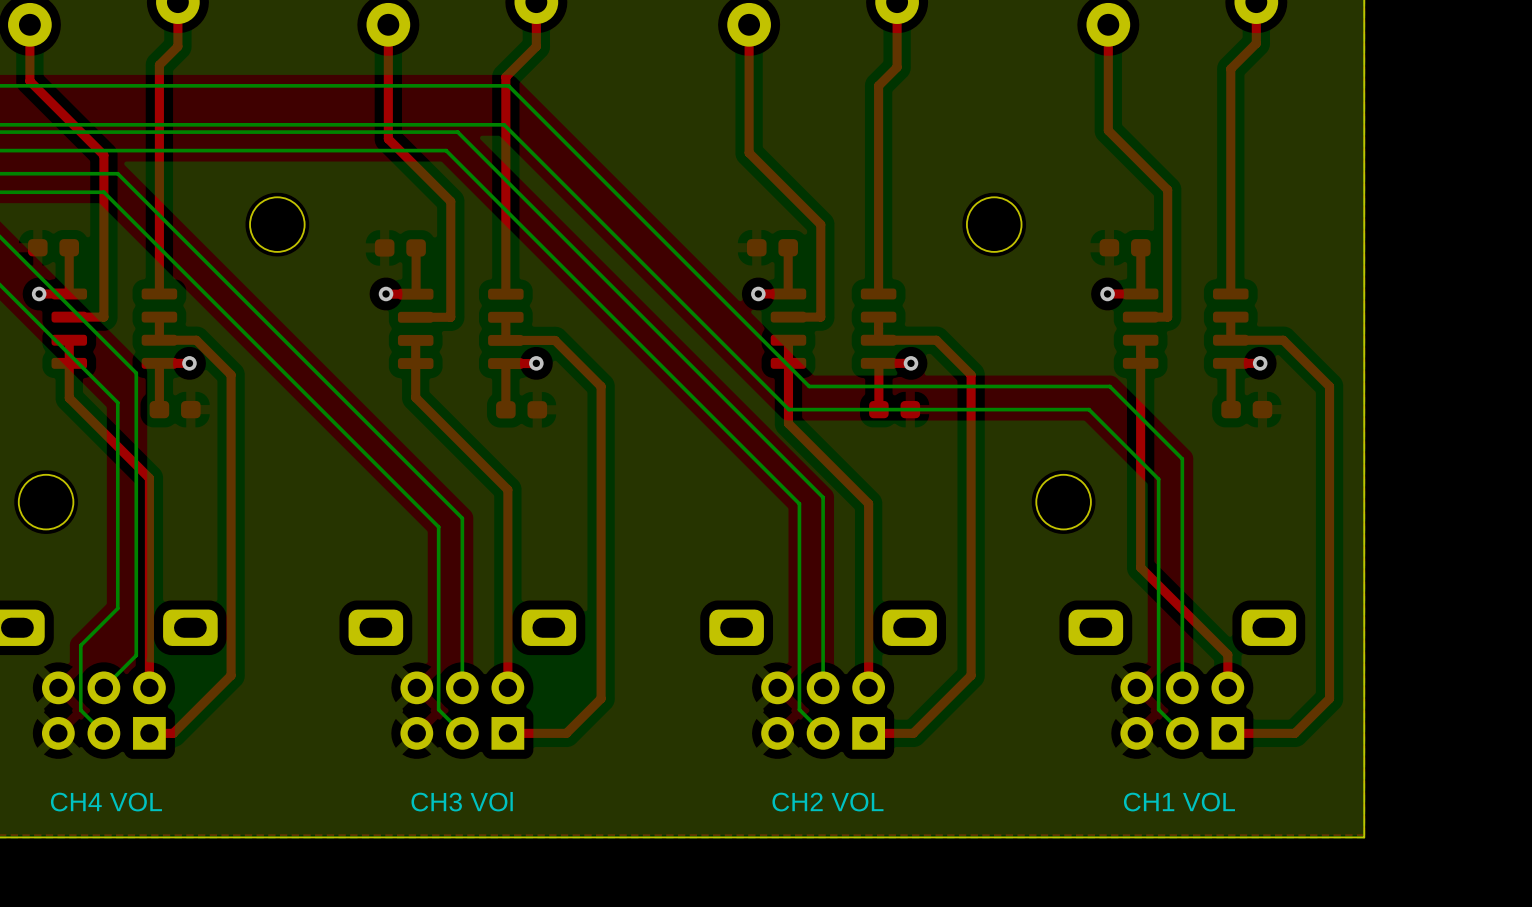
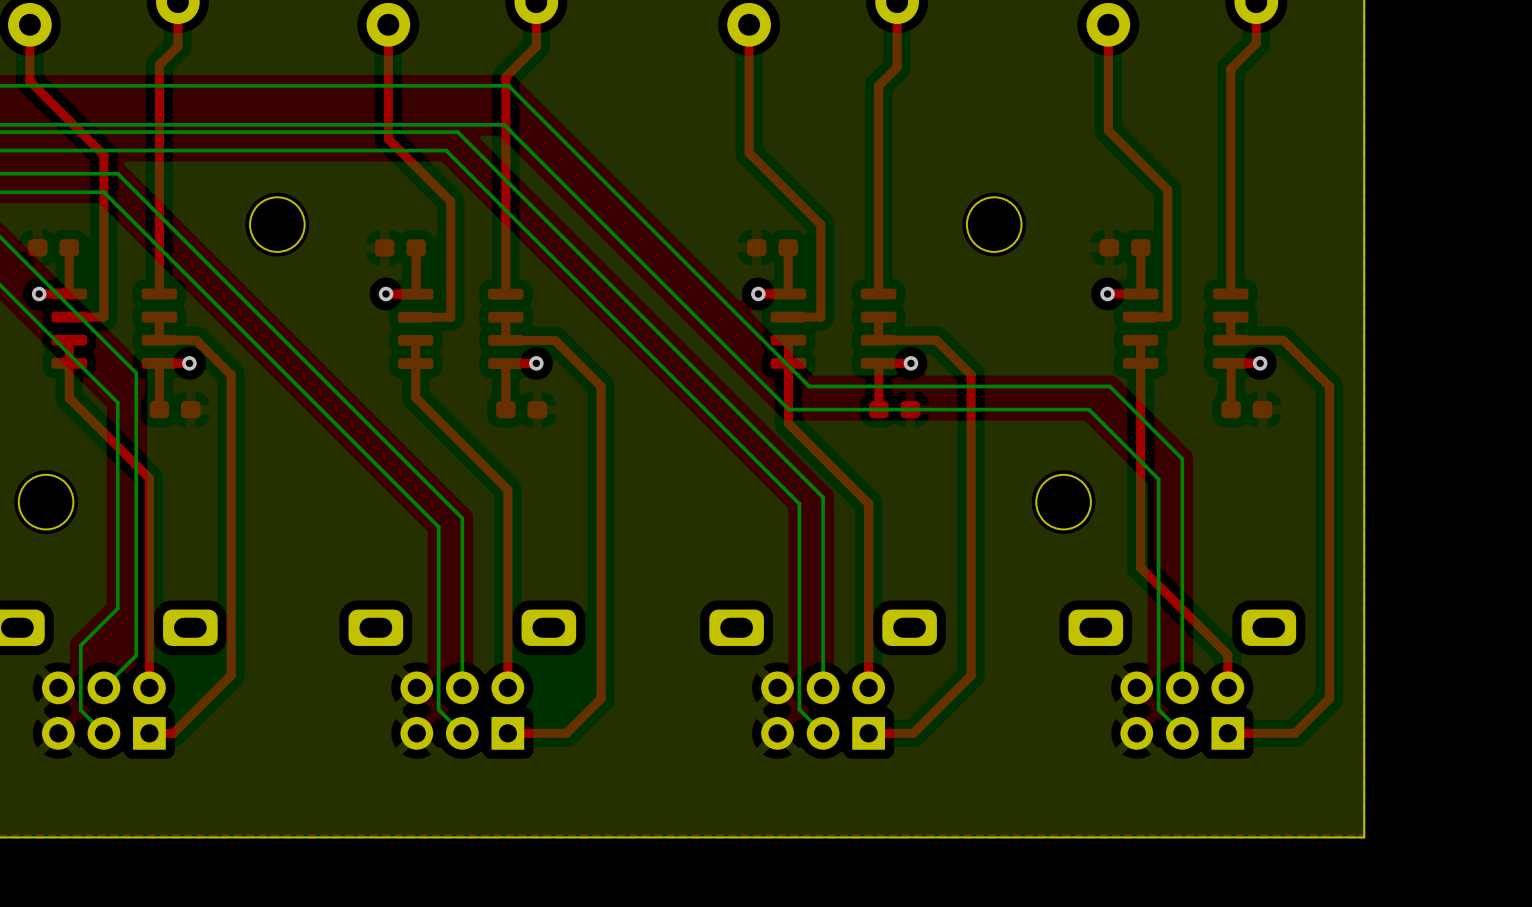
part text: CH3 VOl (462, 801) -> none
part text: CH4 VOL (106, 802) -> none
part text: CH2 VOL (827, 802) -> none
part text: CH1 VOL (1179, 802) -> none

